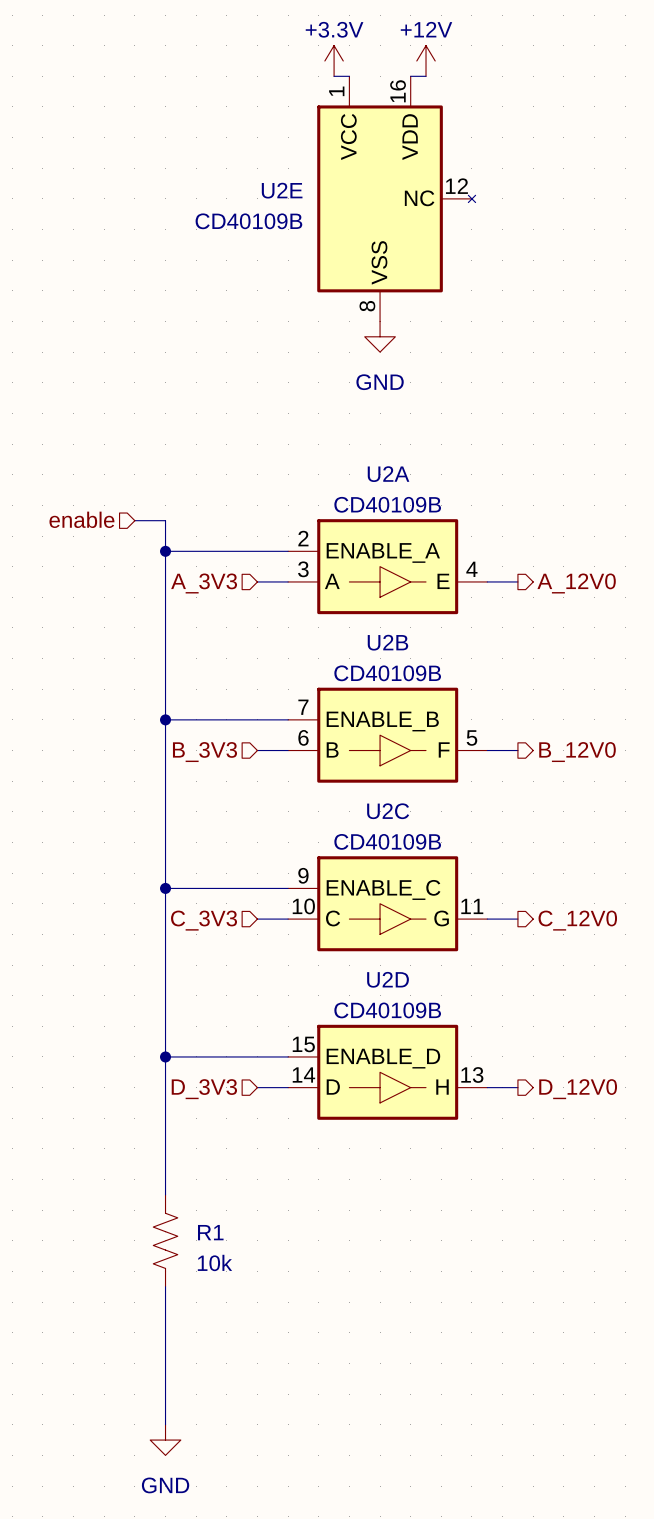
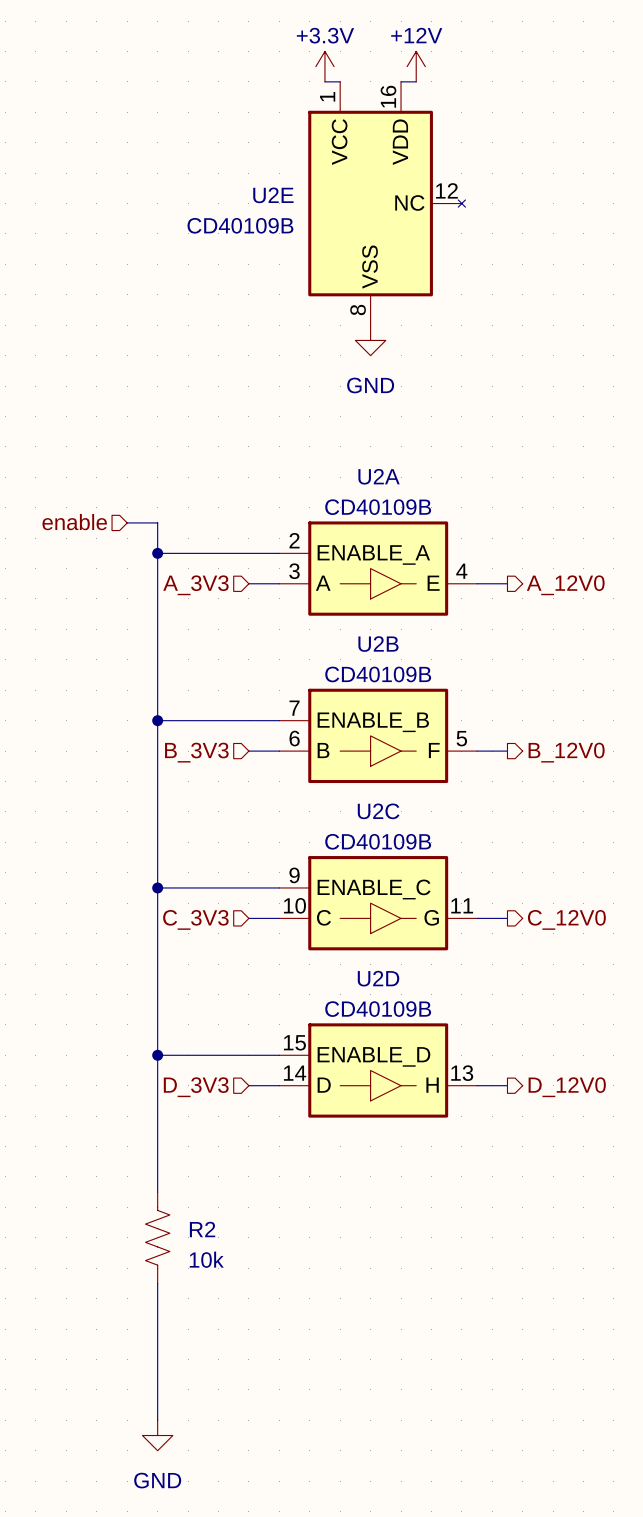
R1 name: R1 (210, 1232) -> R2 (202, 1229)

